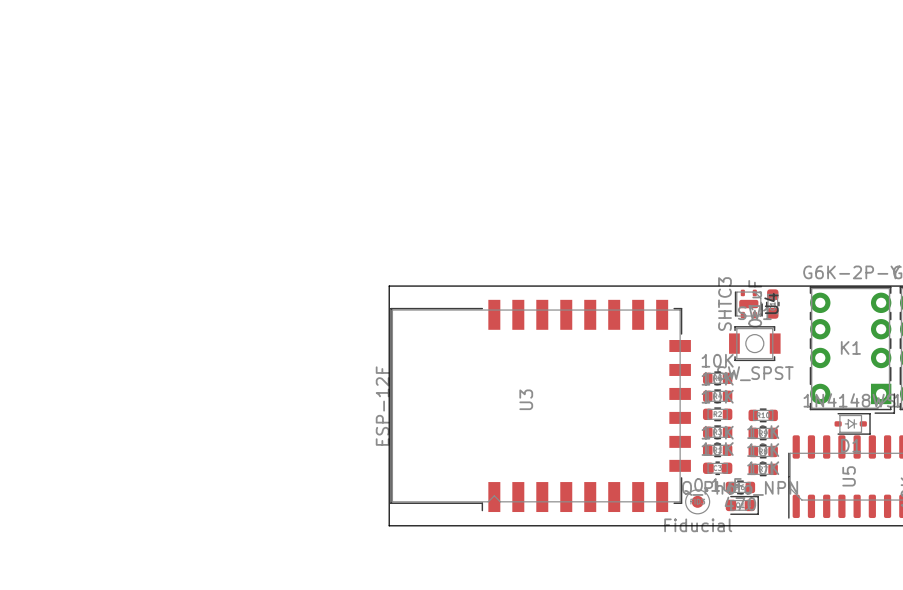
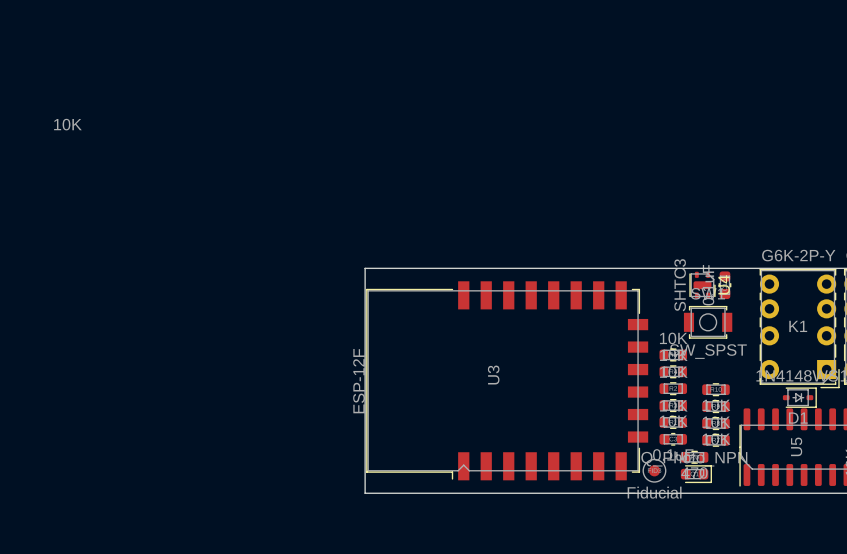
part value: none -> 10K (67, 124)

